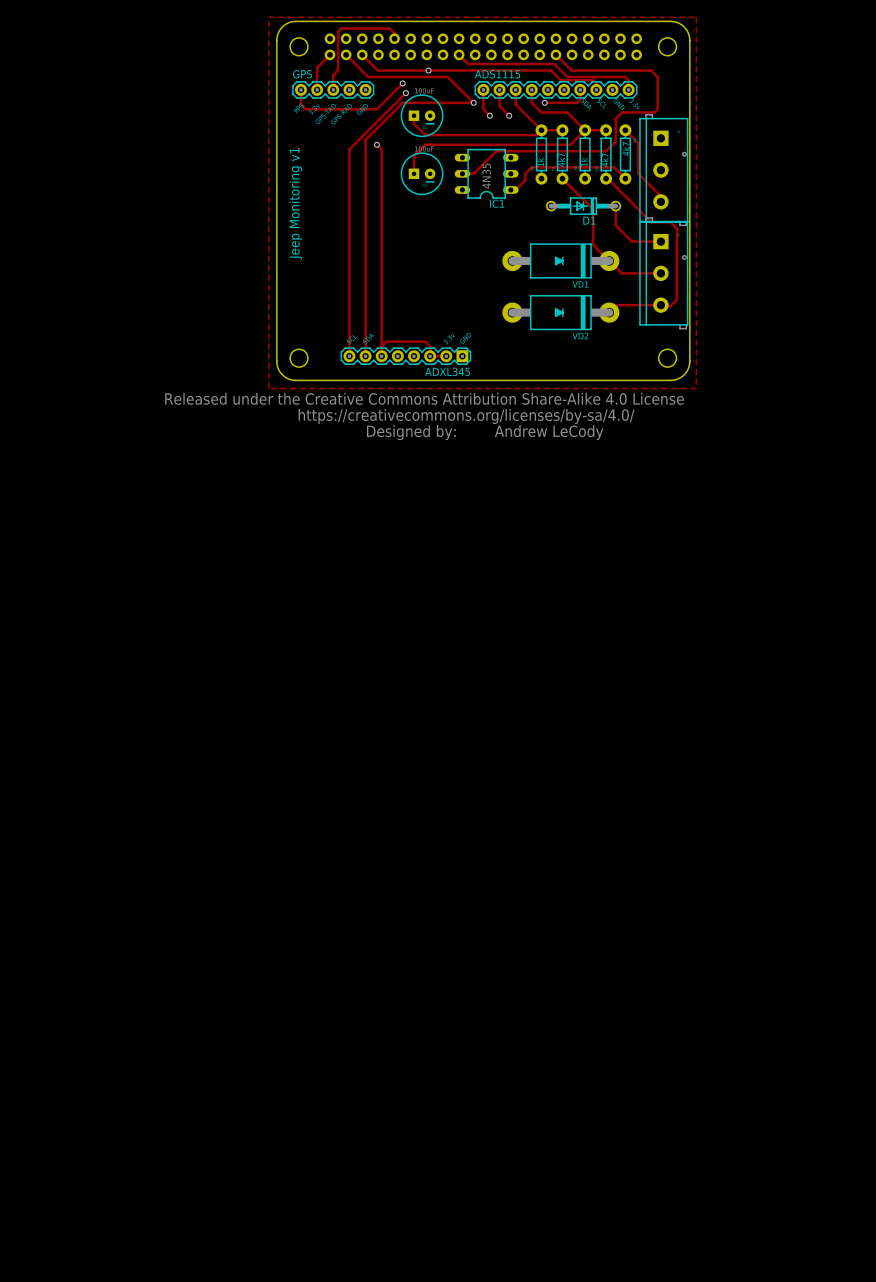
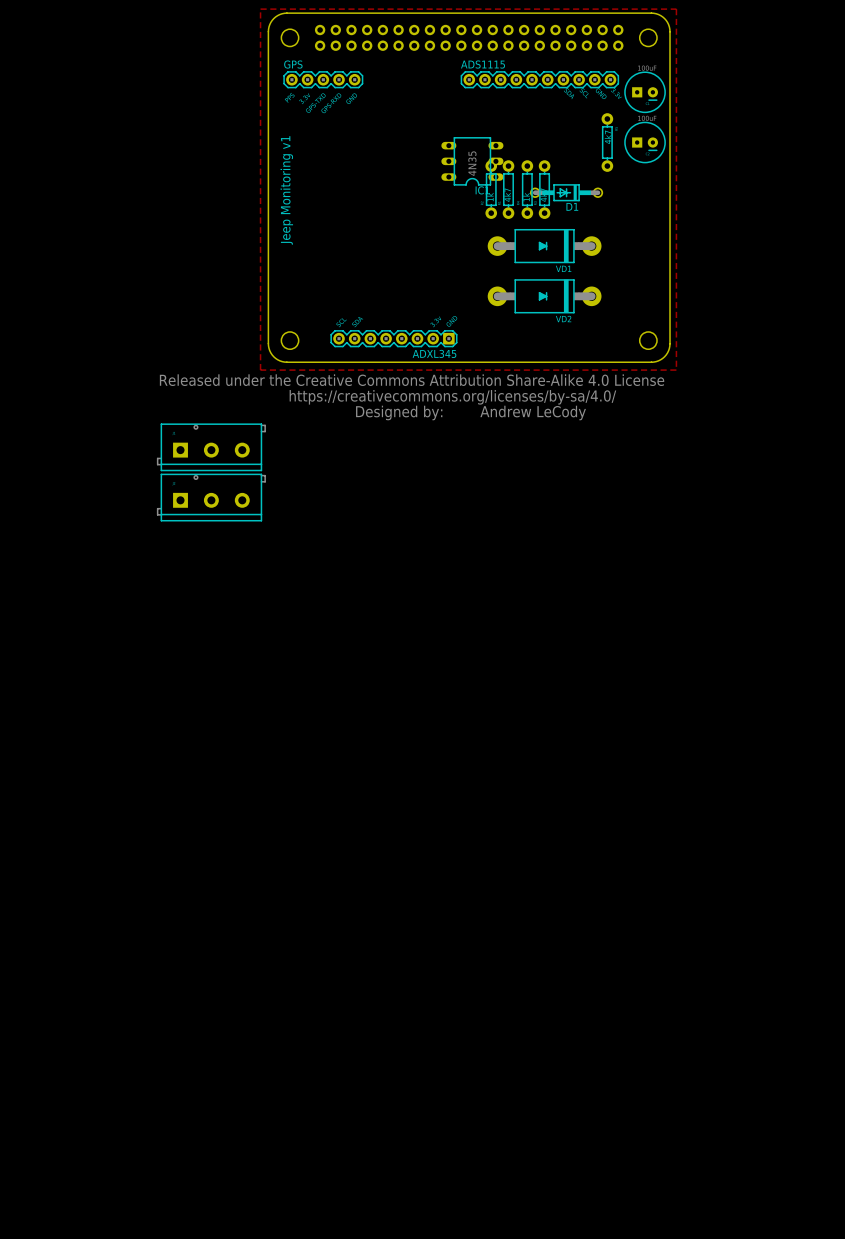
track: (394, 38) (394, 33) (389, 28) (341, 28) (338, 31) (338, 70) (333, 75) (333, 89) -> none
track: (329, 54) (317, 67) (317, 89) -> none
track: (346, 54) (368, 76) (447, 76) (473, 102) (402, 102) (365, 139) (365, 356) -> none
track: (362, 54) (377, 70) (551, 70) (560, 80) (593, 80) (596, 83) (596, 89) -> none
track: (459, 54) (468, 64) (554, 64) (567, 76) (625, 76) (628, 80) (628, 89) -> none
track: (555, 54) (571, 70) (651, 70) (657, 76) (657, 109) (654, 112) (622, 112) (615, 118) (615, 141) (606, 151) (496, 151) (473, 173) (462, 173) -> none
via: (428, 70) -> none
track: (402, 83) (376, 109) (305, 109) (301, 104) (301, 89) -> none
via: (402, 83) -> none
track: (483, 89) (483, 109) (489, 115) -> none
track: (499, 89) (499, 106) (509, 115) -> none
track: (515, 89) (515, 104) (541, 130) -> none
track: (531, 89) (531, 102) (541, 112) (567, 112) (585, 130) -> none
track: (580, 89) (580, 99) (577, 102) (544, 102) -> none
track: (405, 93) (349, 149) (349, 356) -> none
via: (405, 93) -> none
via: (473, 102) -> none
via: (544, 102) -> none
track: (414, 115) (414, 123) (425, 135) (536, 135) (541, 130) -> none
part position: (422, 115) -> (645, 92)
via: (489, 115) -> none
via: (509, 115) -> none
track: (541, 130) (562, 130) -> none
track: (585, 130) (606, 130) -> none
track: (585, 130) (570, 144) (425, 144) (414, 156) (414, 173) -> none
track: (625, 130) (638, 143) (638, 173) (660, 196) (660, 201) -> none
track: (376, 144) (381, 149) (381, 356) -> none
via: (376, 144) -> none
part position: (541, 154) -> (491, 189)
part position: (562, 154) -> (508, 189)
part position: (585, 154) -> (527, 189)
part position: (606, 154) -> (544, 189)
part rotation: 0° (663, 170) -> 90° counterclockwise (211, 497)
part position: (663, 170) -> (211, 497)
part position: (422, 173) -> (645, 142)
track: (562, 178) (593, 209) (593, 244) (621, 273) (660, 273) -> none
track: (606, 178) (651, 222) (670, 222) (677, 228) (677, 299) (670, 306) (616, 305) (609, 312) -> none
track: (625, 178) (614, 167) (531, 167) (525, 173) (525, 180) (515, 189) (510, 189) -> none
track: (615, 206) (615, 225) (631, 241) (660, 241) -> none
part rotation: 0° (663, 273) -> 90° counterclockwise (211, 447)
part position: (663, 273) -> (211, 447)
track: (381, 346) (386, 341) (425, 341) (430, 346) (430, 356) (446, 356) -> none

